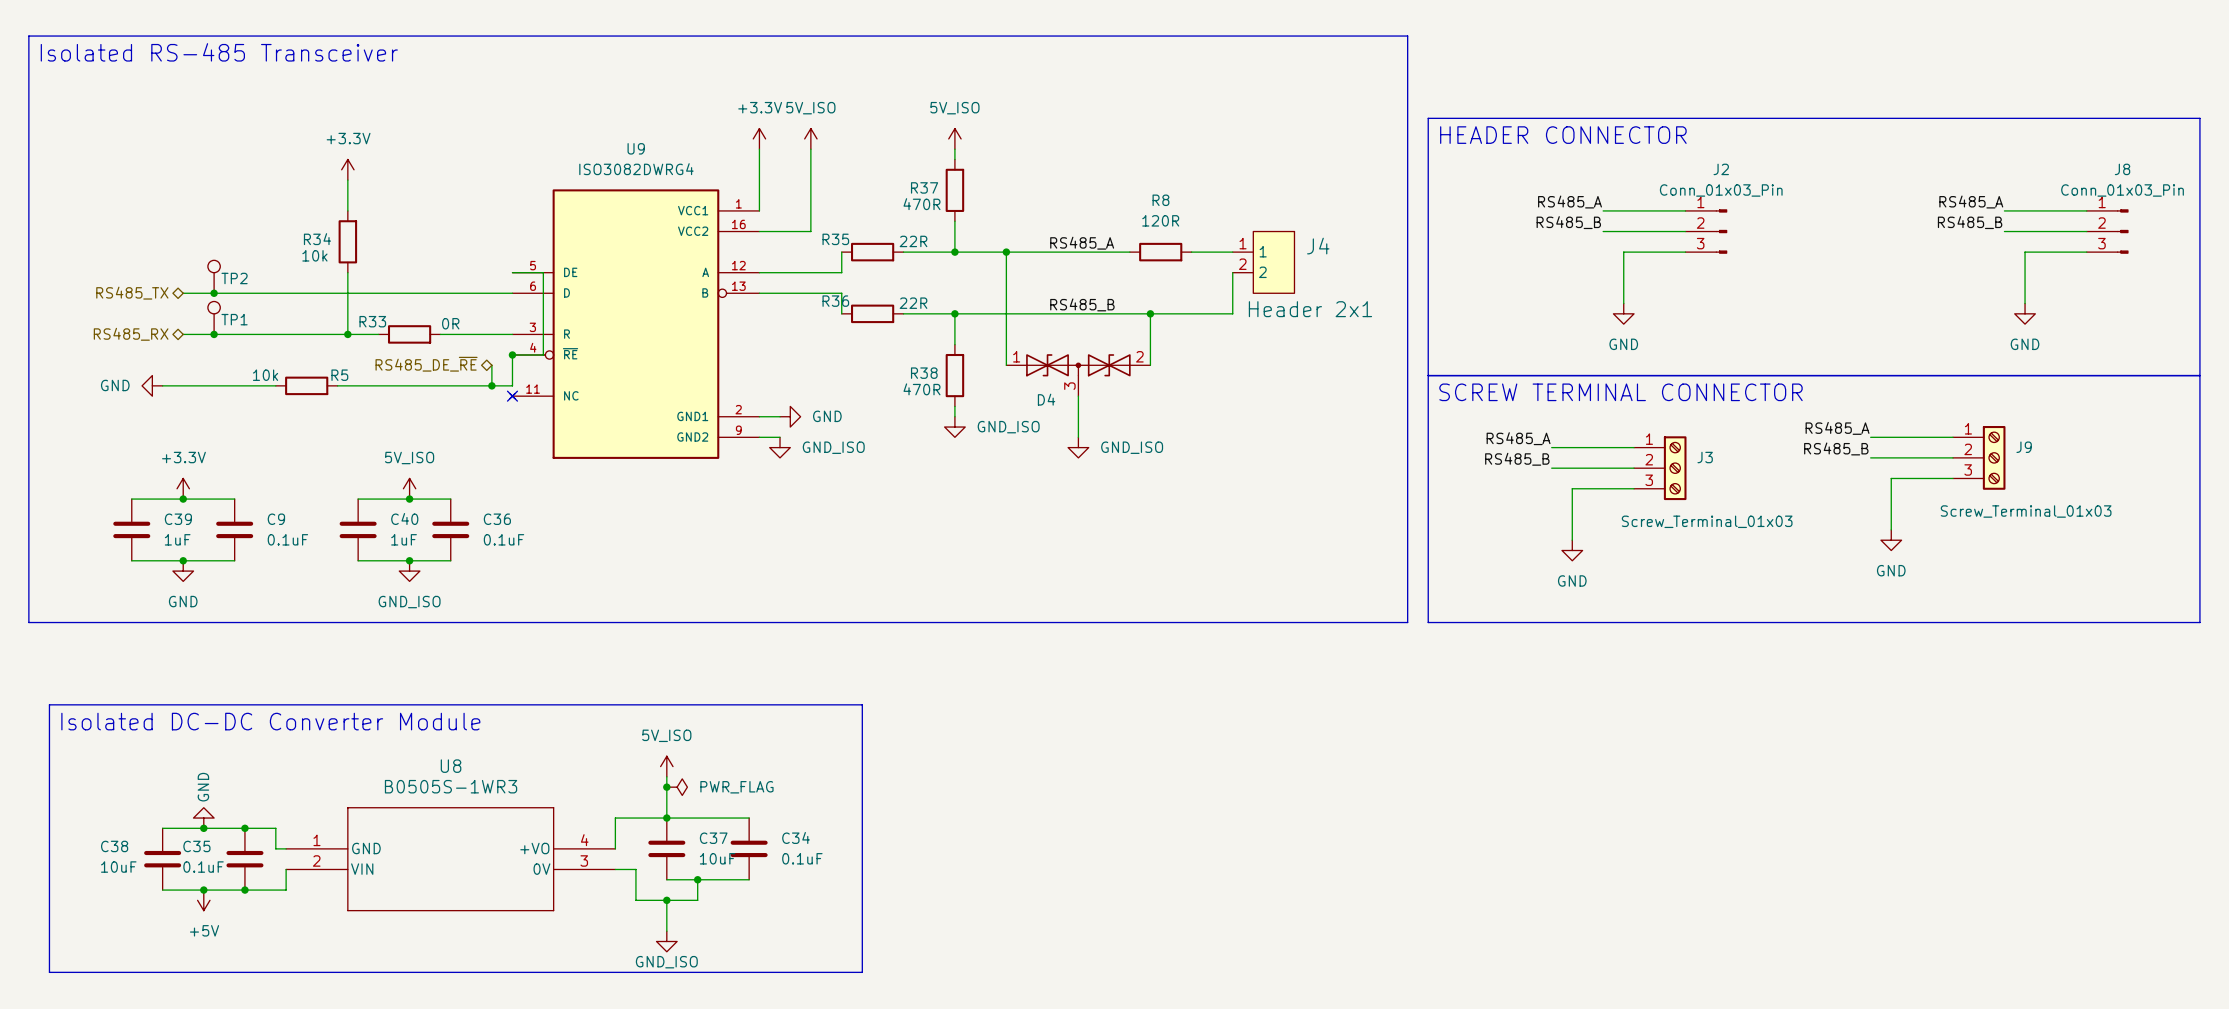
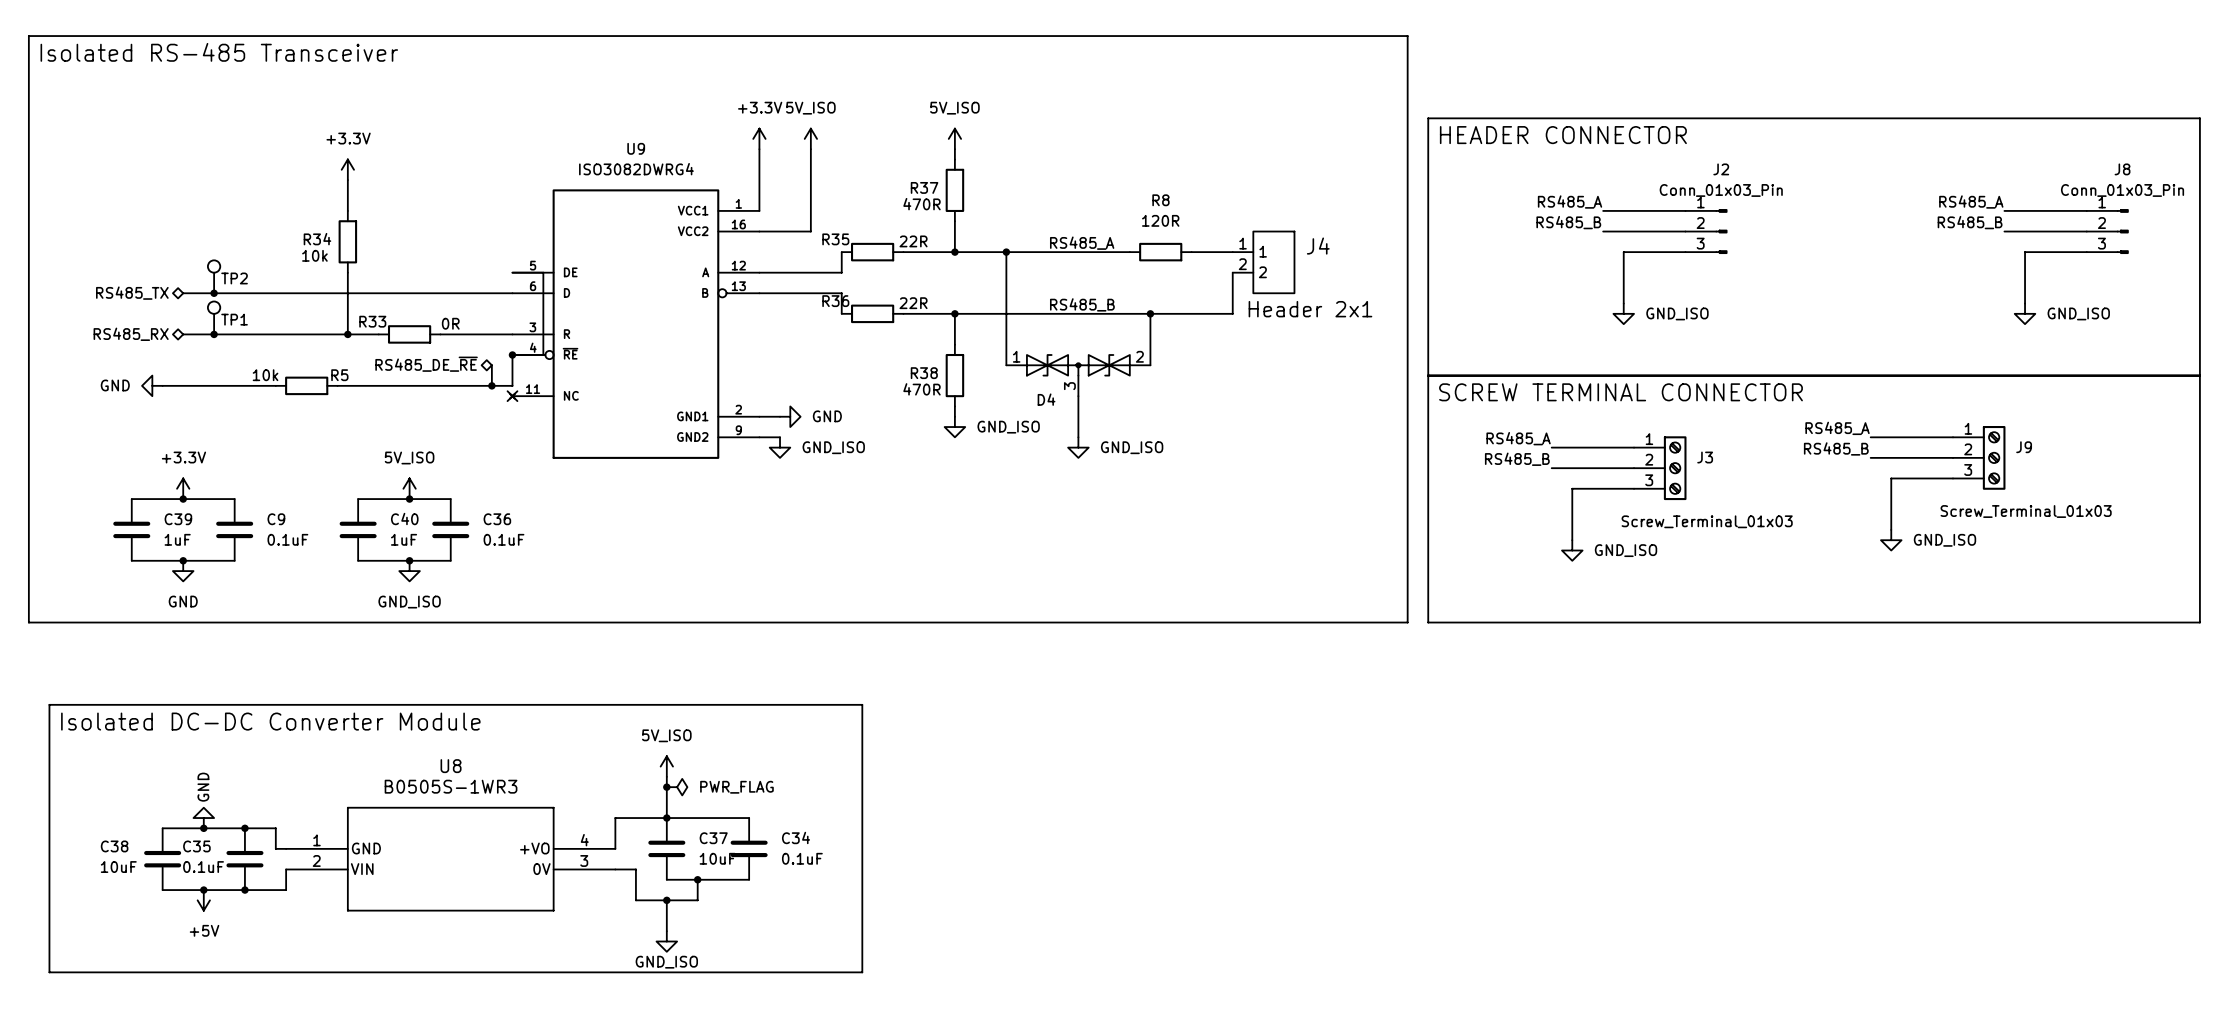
power symbol: GND (1623, 313) -> GND_ISO (1623, 313)
power symbol: GND (2025, 313) -> GND_ISO (2025, 313)
power symbol: GND (1891, 540) -> GND_ISO (1891, 540)
power symbol: GND (1572, 550) -> GND_ISO (1572, 550)

